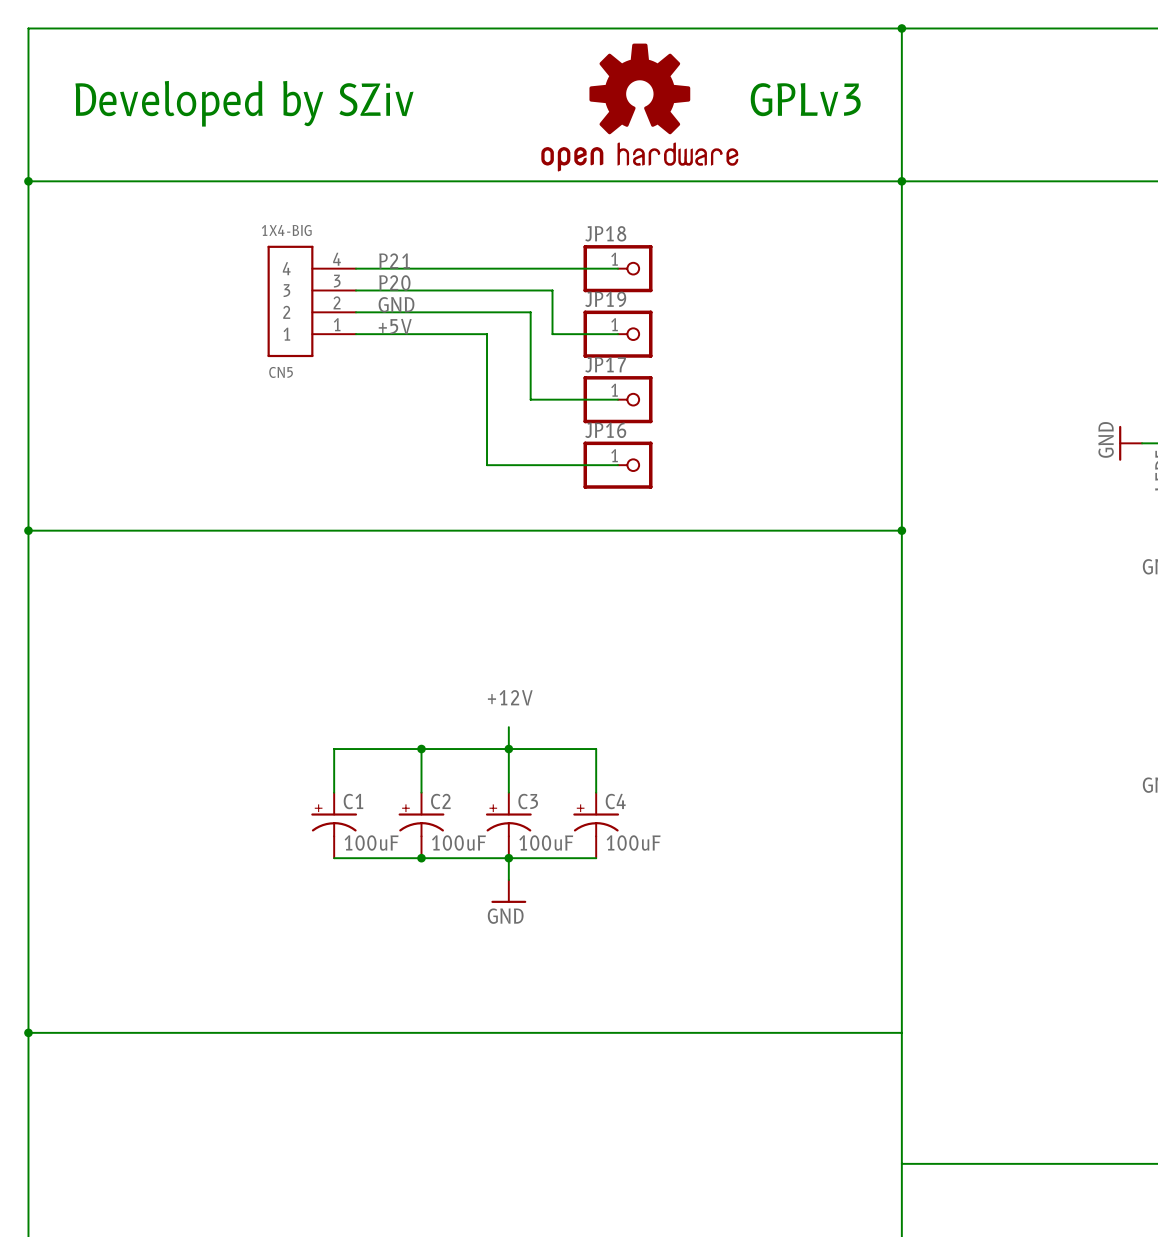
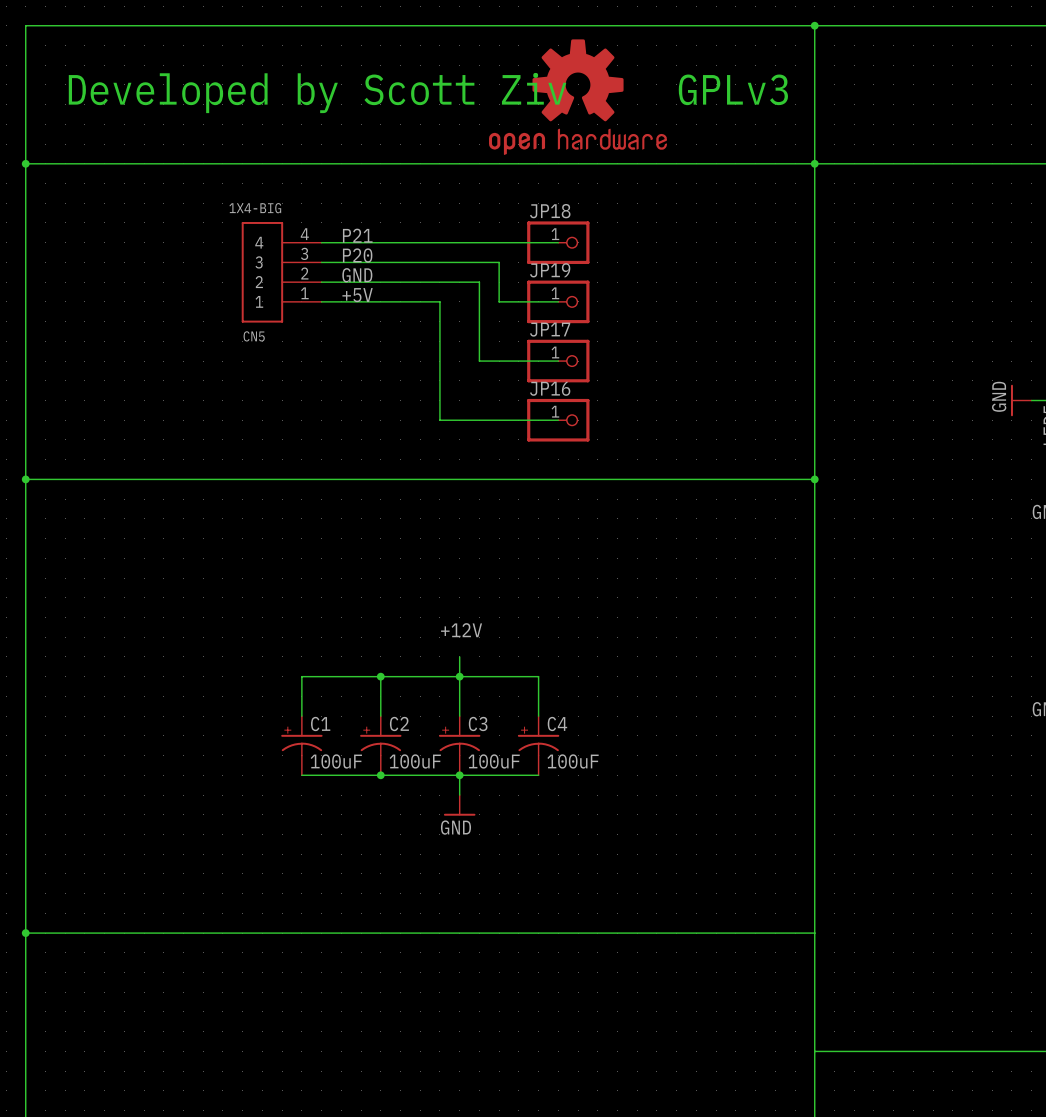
text: Developed by SZiv (244, 103) -> Developed by Scott Ziv (317, 93)

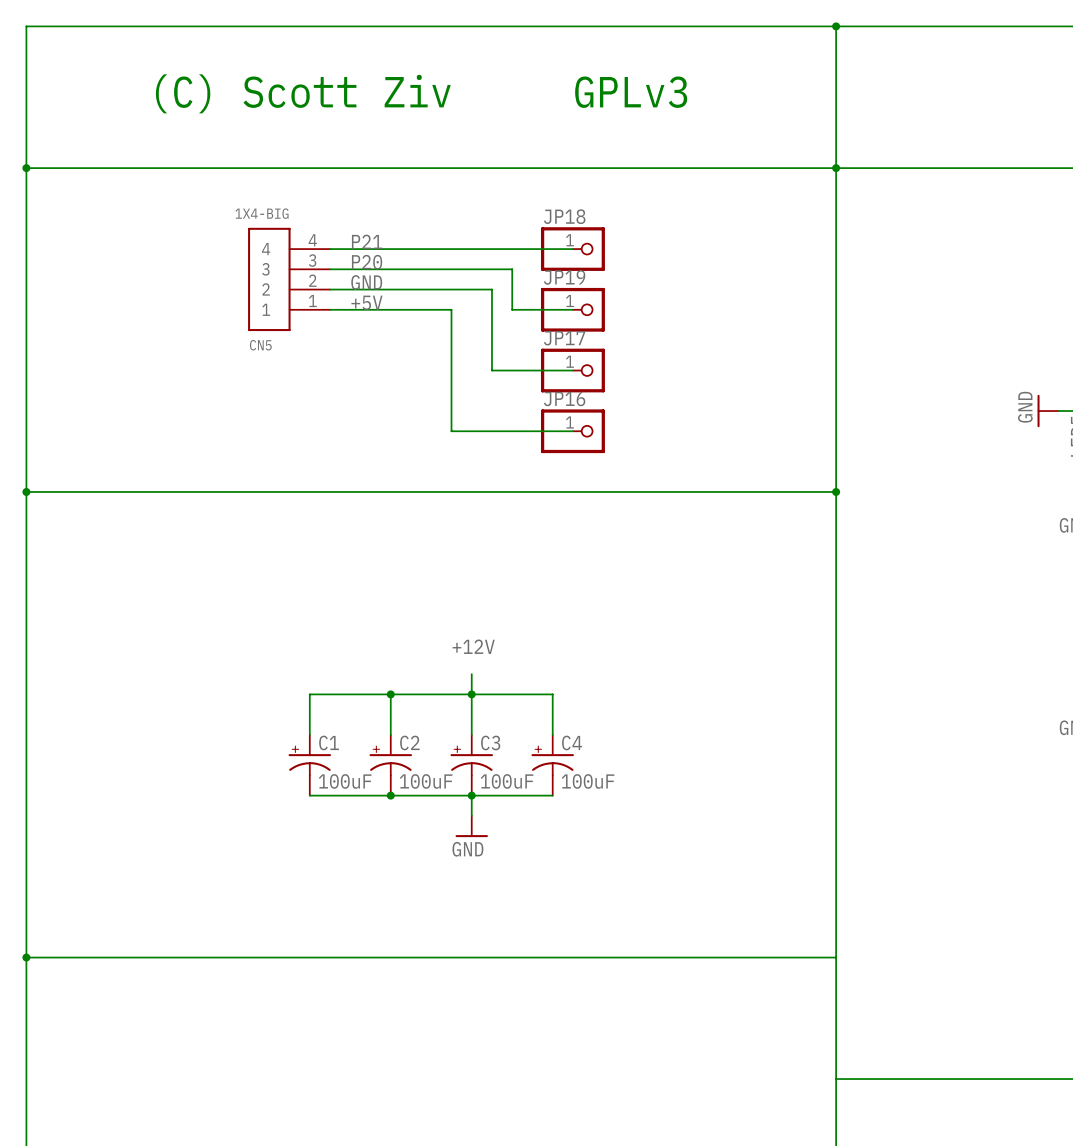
text position: GPLv3 (733, 89) -> GPLv3 (631, 92)
text: none -> (C) Scott Ziv (303, 93)
text: Developed by Scott Ziv (317, 93) -> none
part: (577, 97) -> none

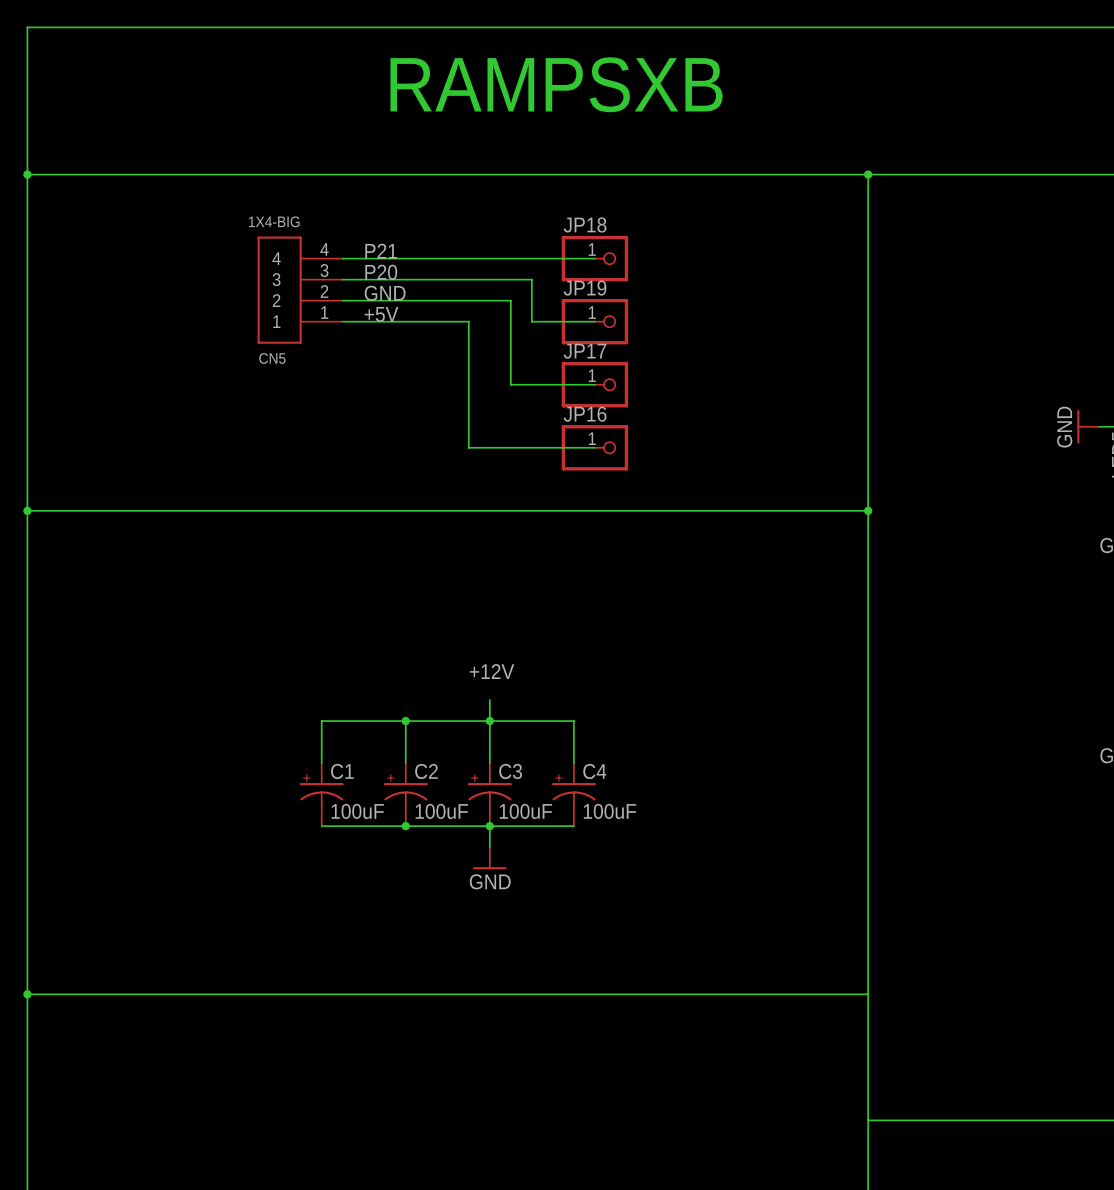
wire: (836, 26) (836, 168) -> none
junction: (836, 26) -> none
text: none -> RAMPSXB (556, 84)
text: GPLv3 (631, 92) -> none
text: (C) Scott Ziv (303, 93) -> none

